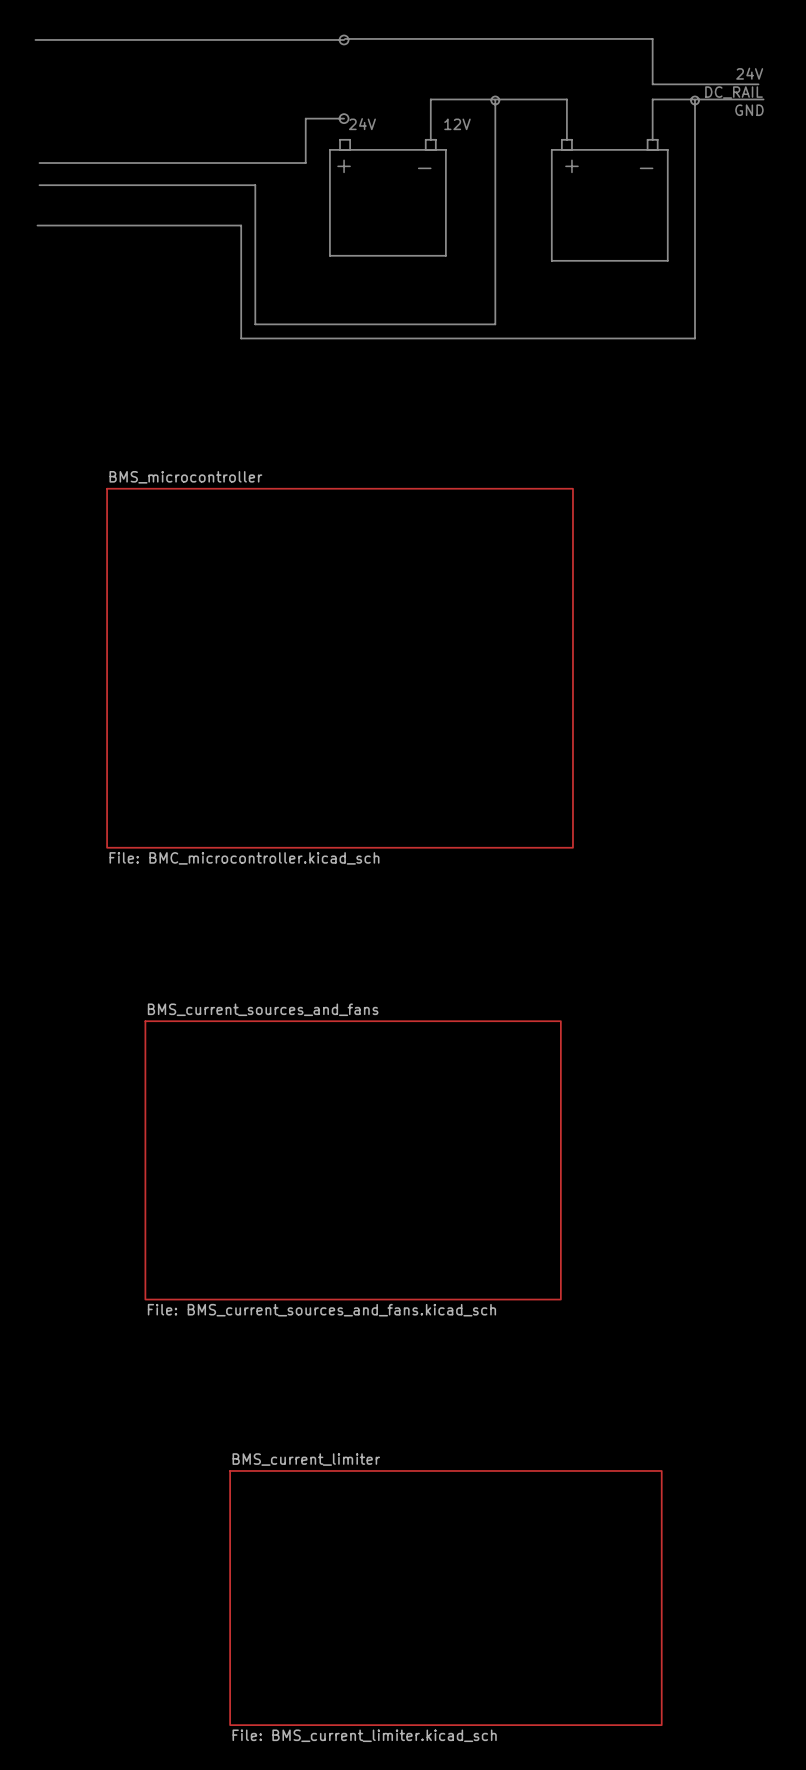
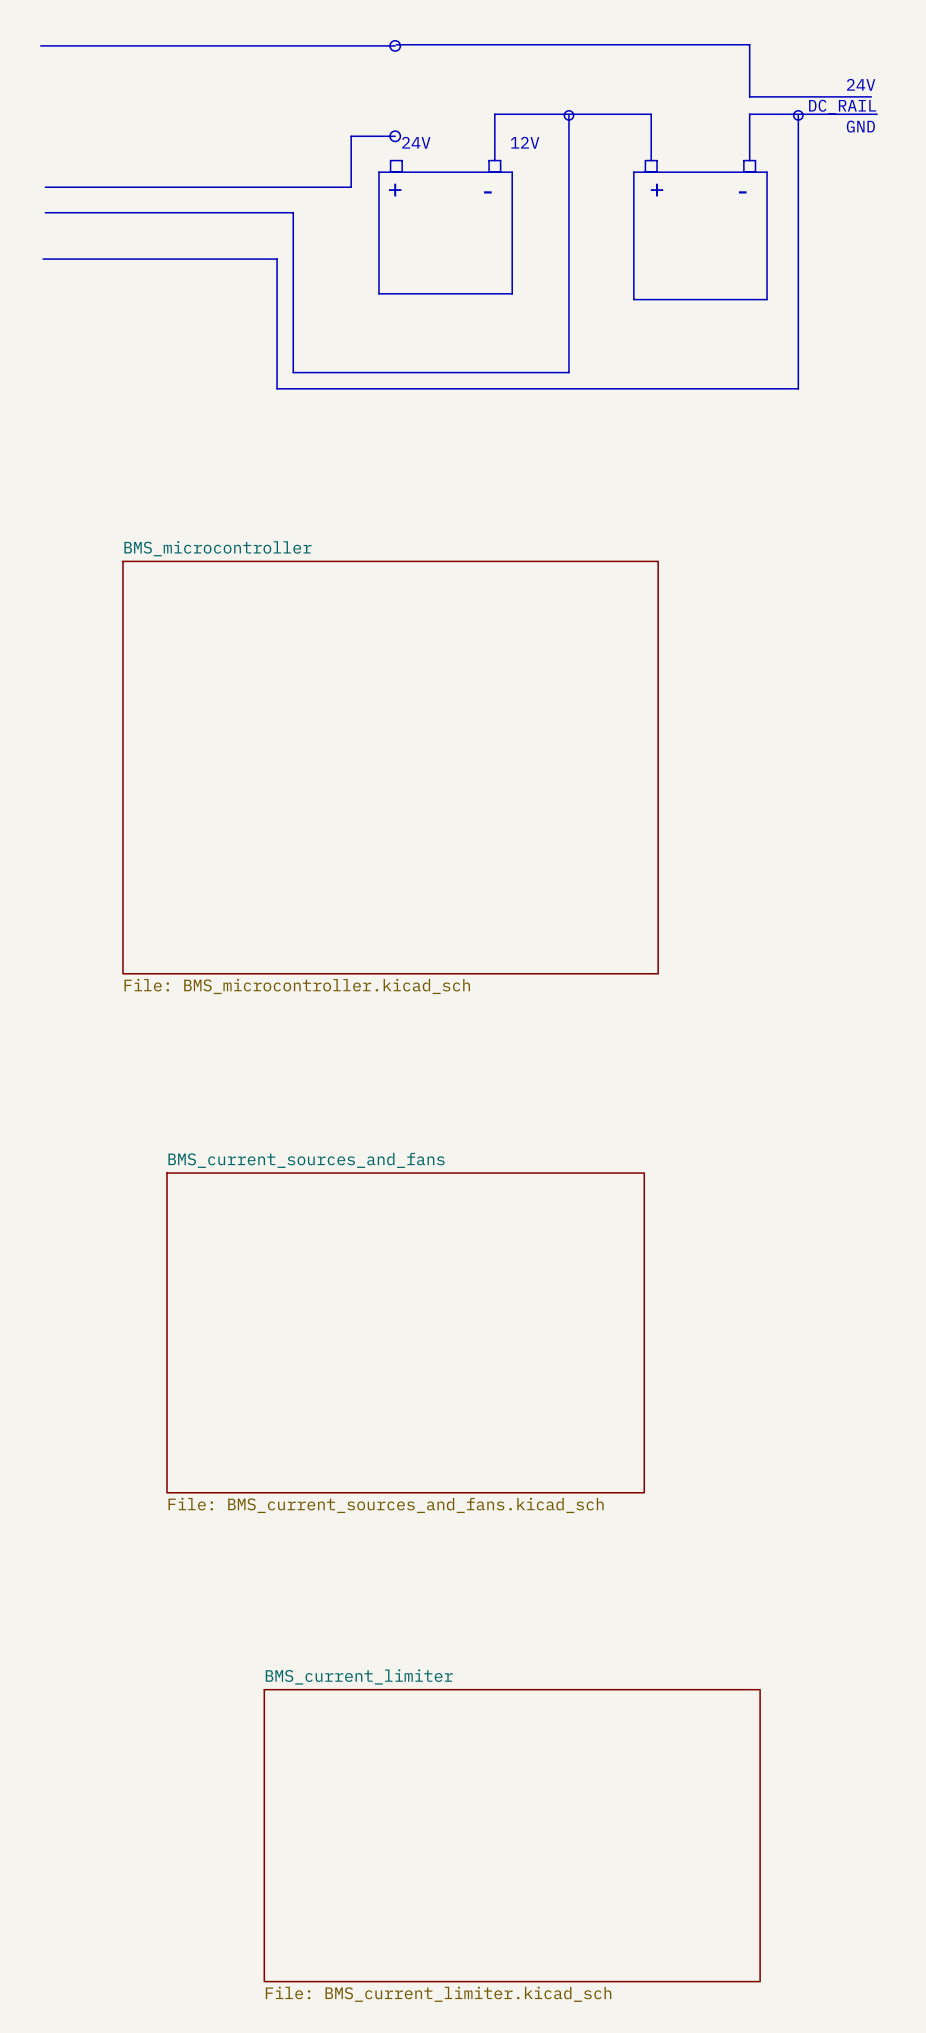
sheet BMS_microcontroller value: File: BMC_microcontroller.kicad_sch (244, 858) -> File: BMS_microcontroller.kicad_sch (297, 986)

